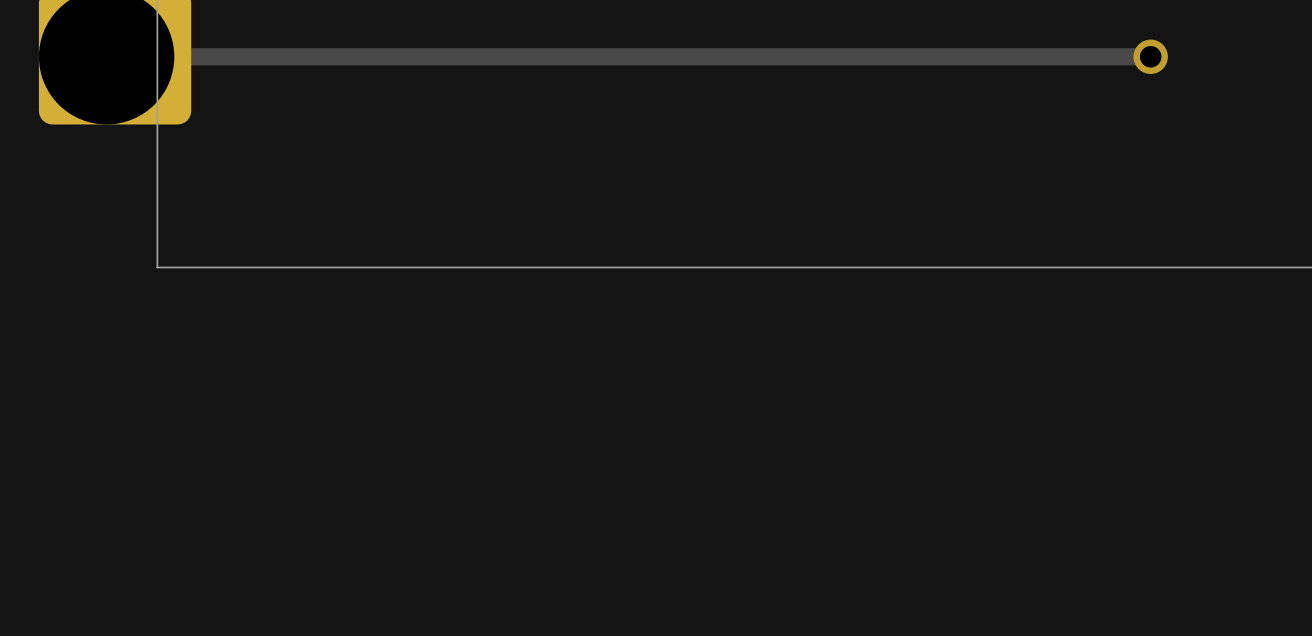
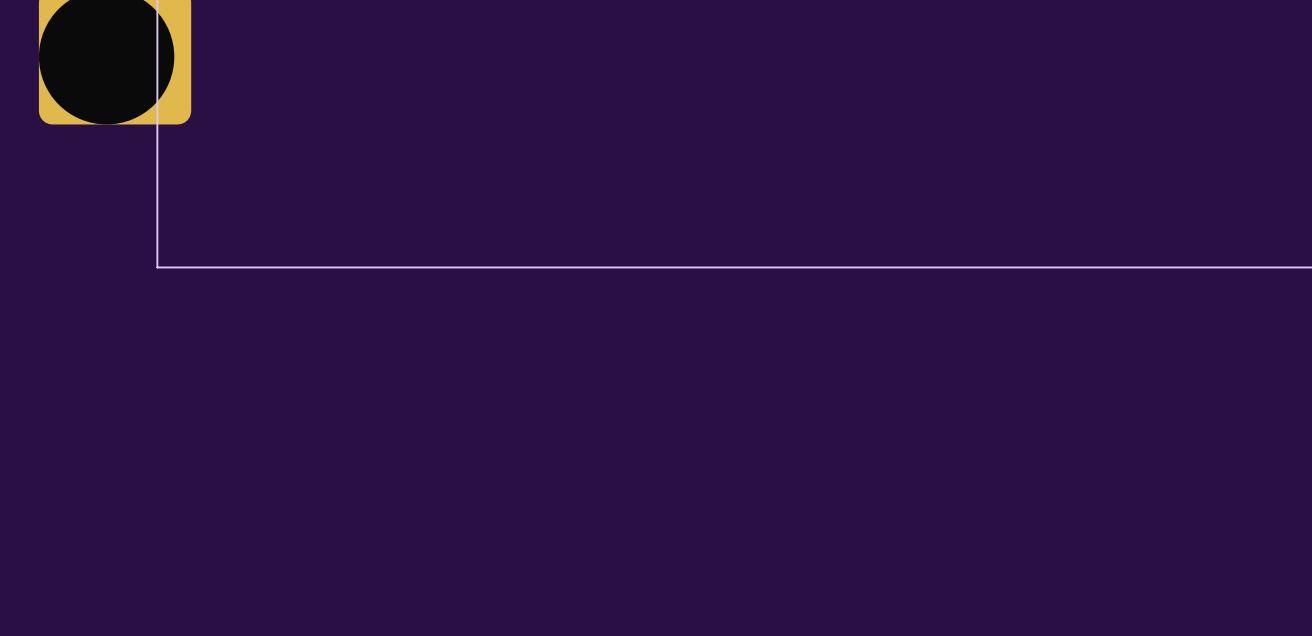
track: (1150, 56) (106, 56) -> none
via: (1150, 56) -> none

